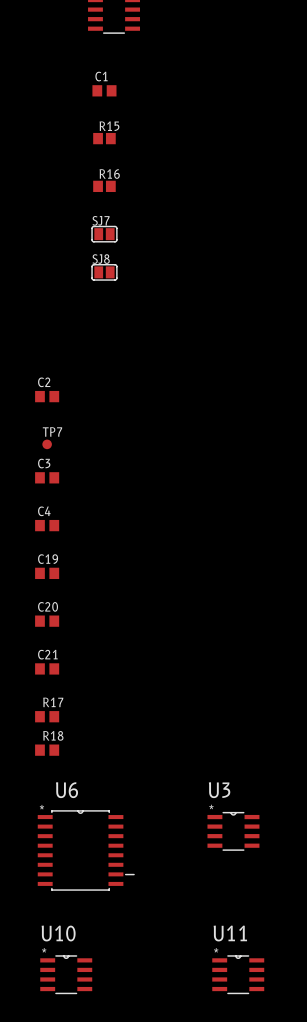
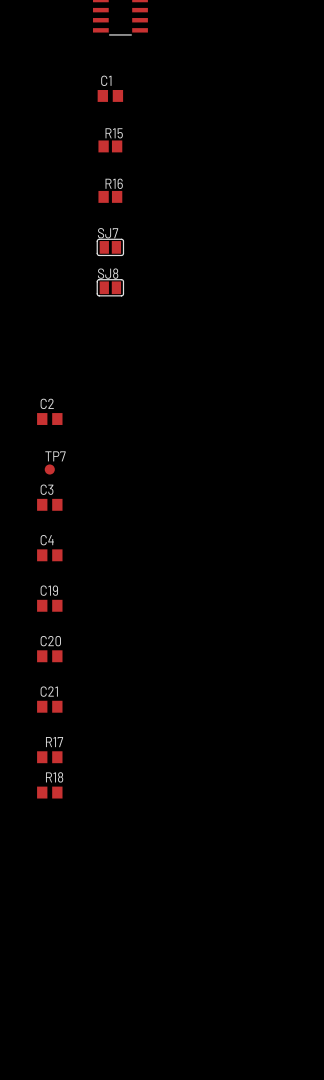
U3: (233, 831) -> none
U6: (86, 850) -> none
U10: (66, 974) -> none
U11: (238, 974) -> none

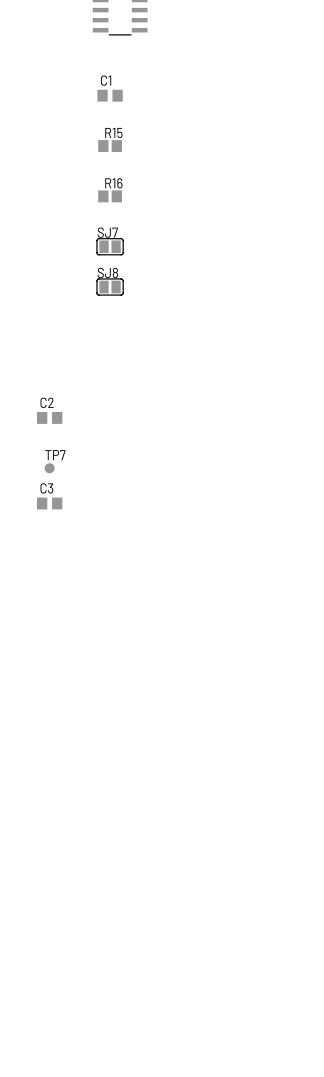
C4: (49, 555) -> none
C19: (49, 605) -> none
C20: (49, 656) -> none
C21: (49, 706) -> none
R17: (49, 757) -> none
R18: (49, 792) -> none

